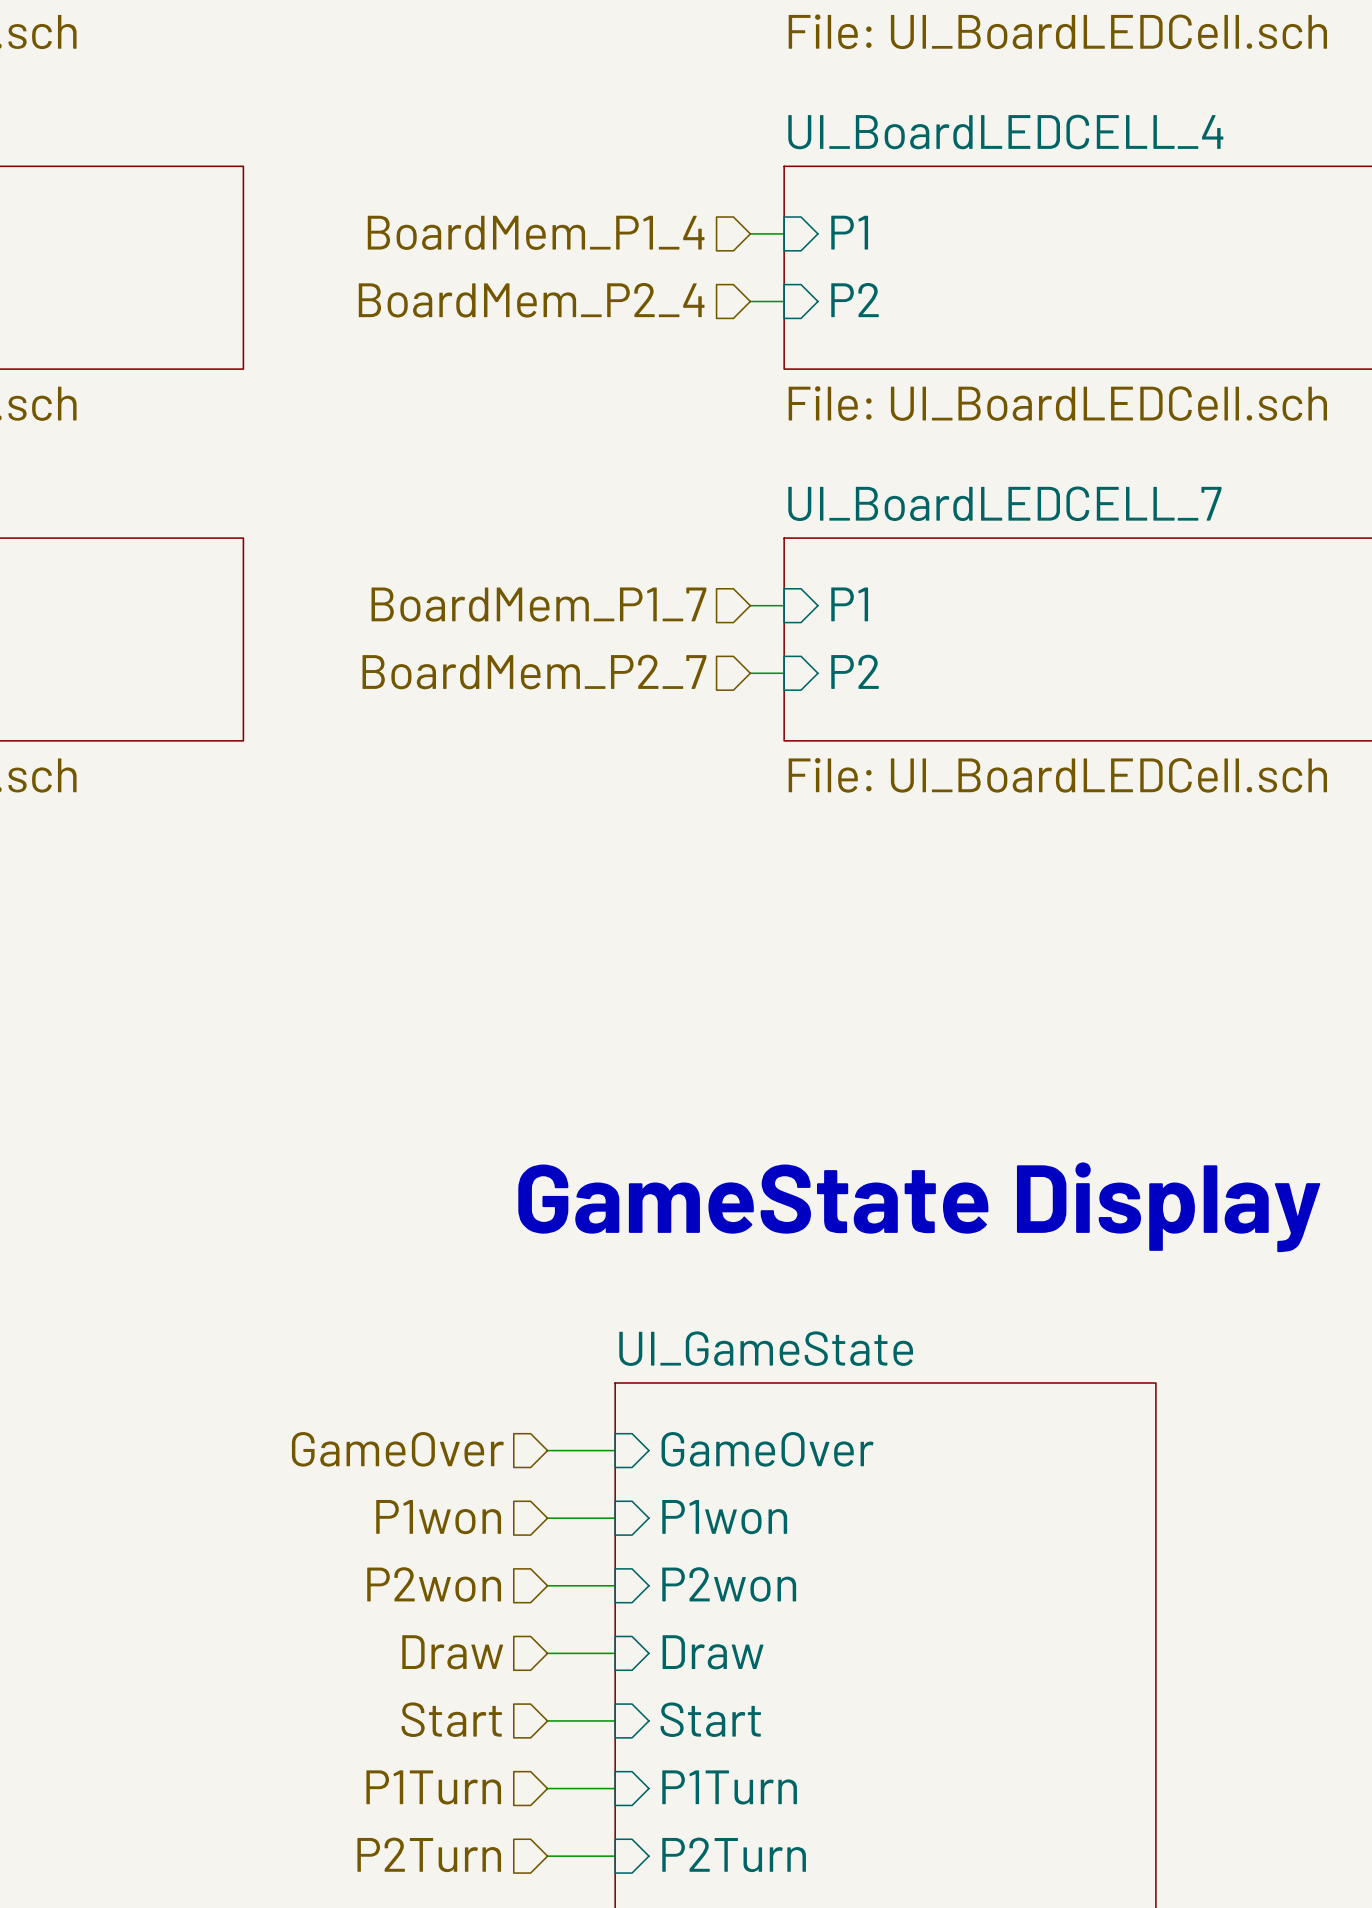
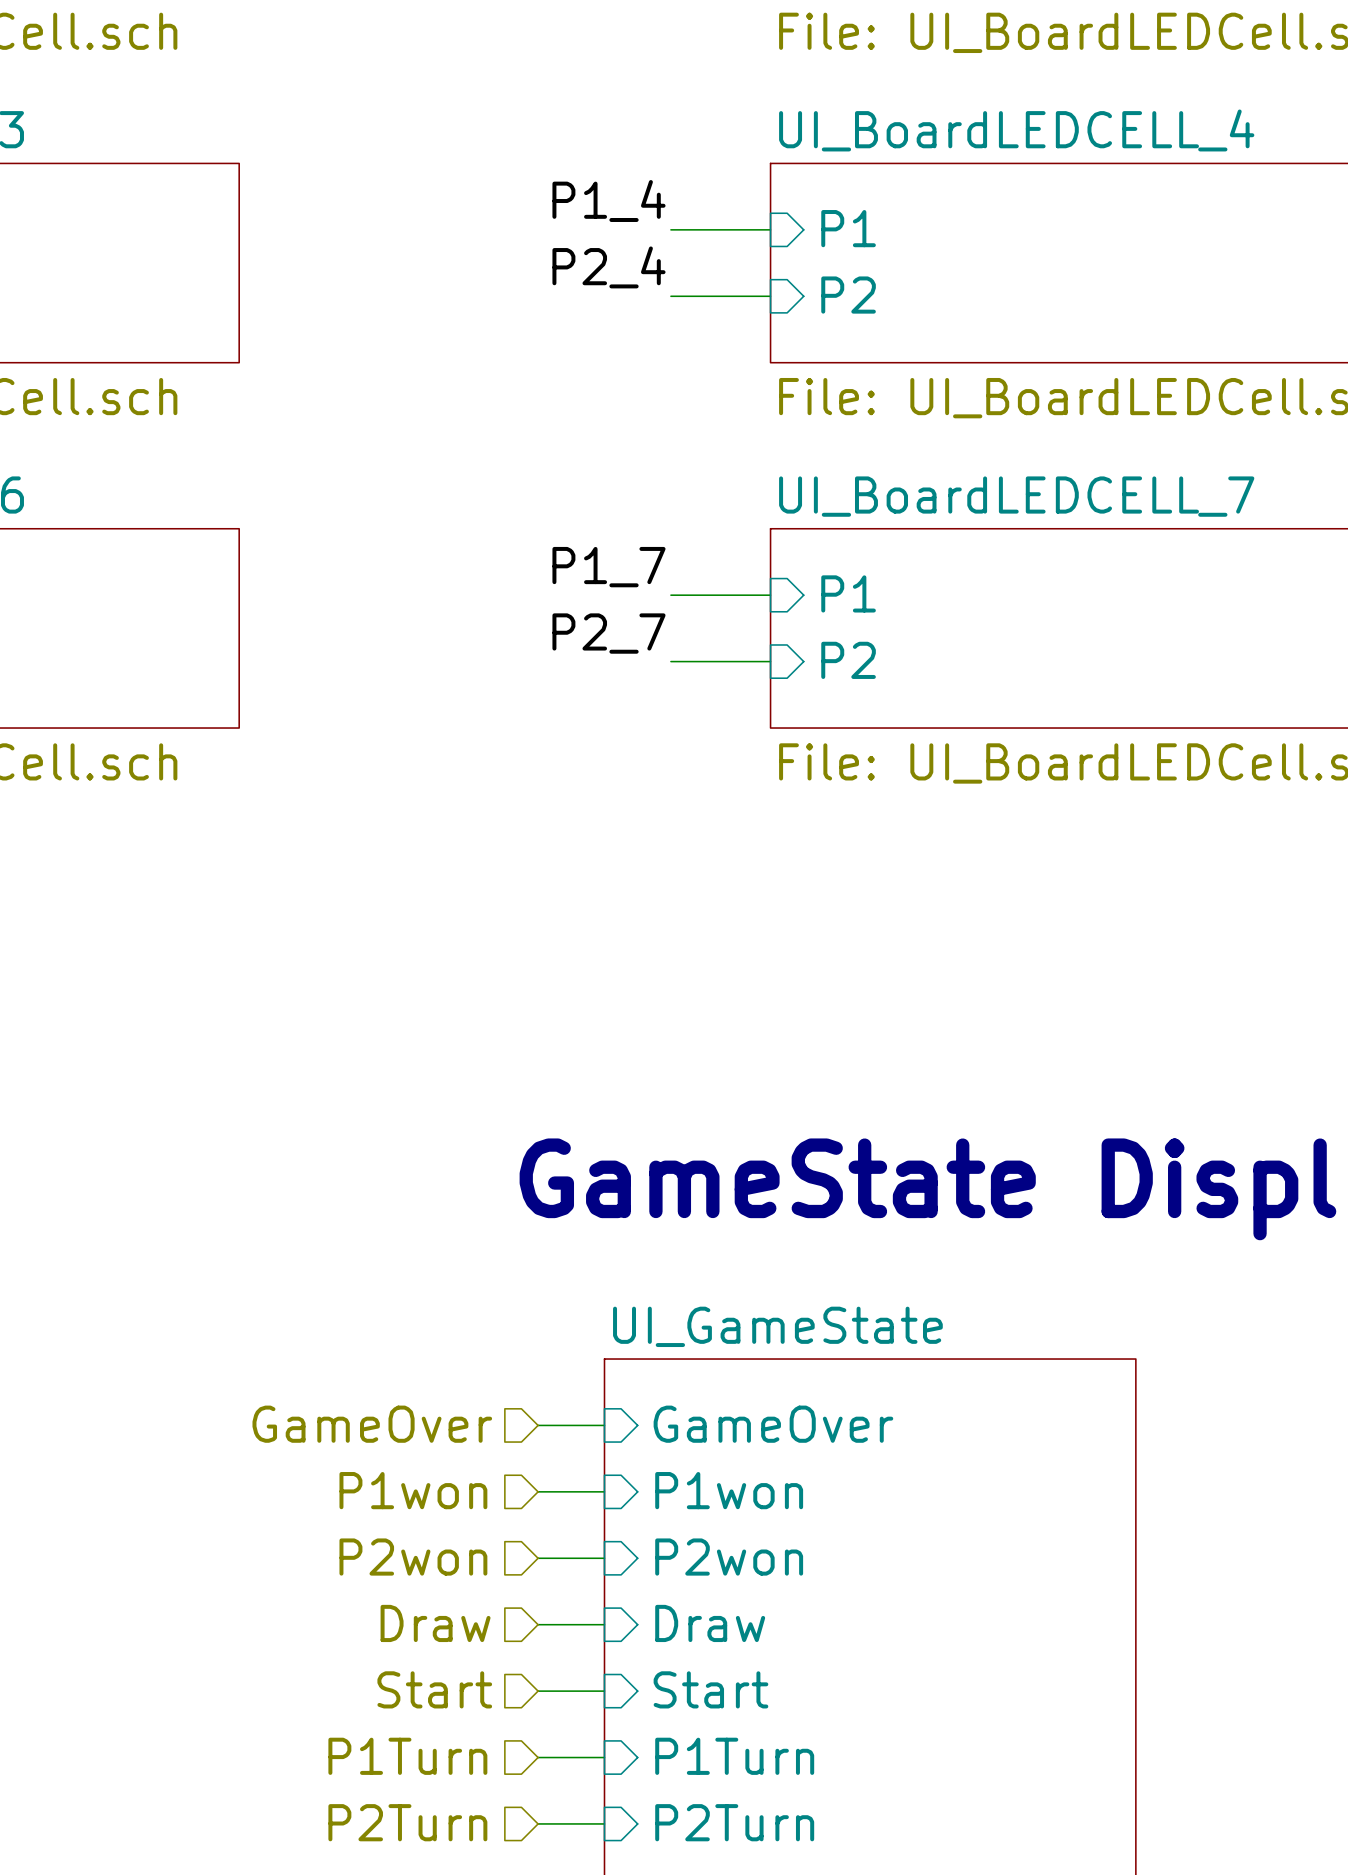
label: none -> P1_4 (608, 201)
hierarchical label: BoardMem_P1_4 (536, 232) -> none
wire: none -> (670, 229) (737, 229)
label: none -> P2_4 (608, 267)
hierarchical label: BoardMem_P2_4 (531, 300) -> none
wire: none -> (670, 296) (737, 296)
label: none -> P1_7 (608, 567)
hierarchical label: BoardMem_P1_7 (538, 604) -> none
wire: none -> (670, 595) (737, 595)
label: none -> P2_7 (608, 633)
hierarchical label: BoardMem_P2_7 (534, 672) -> none
wire: none -> (670, 661) (737, 661)

